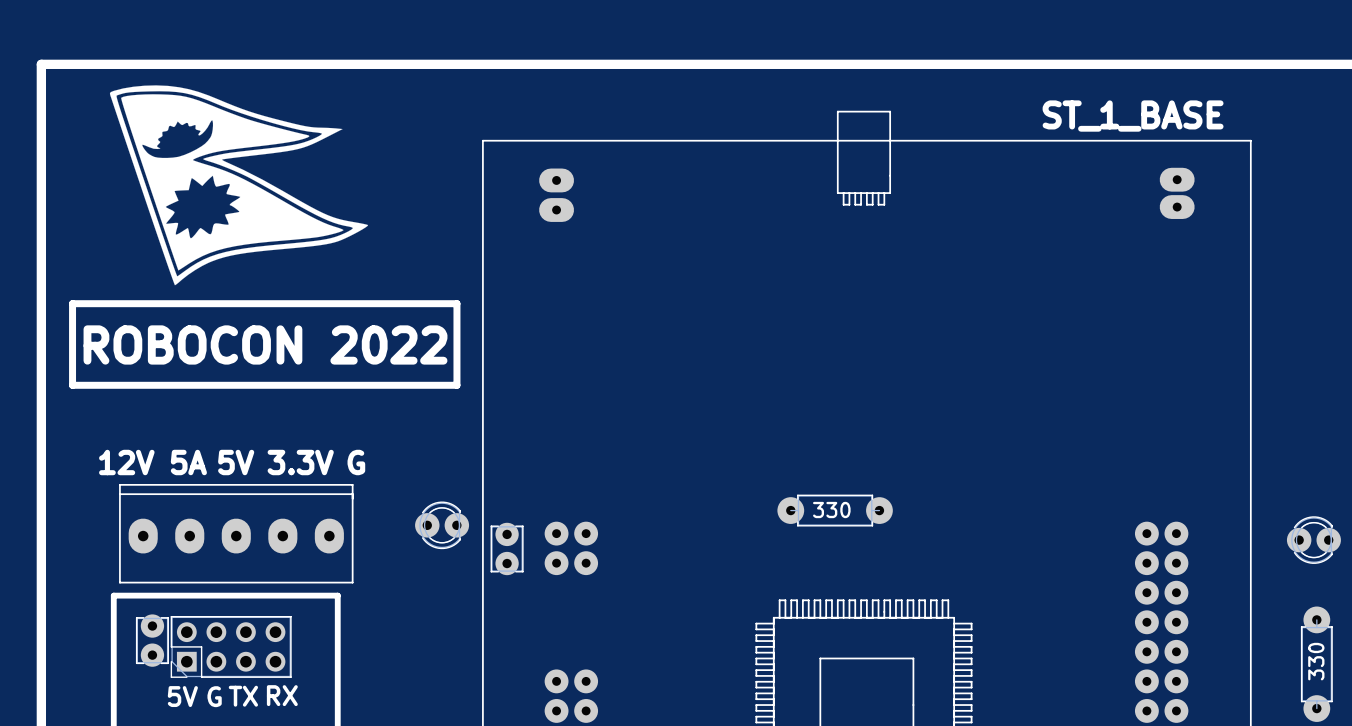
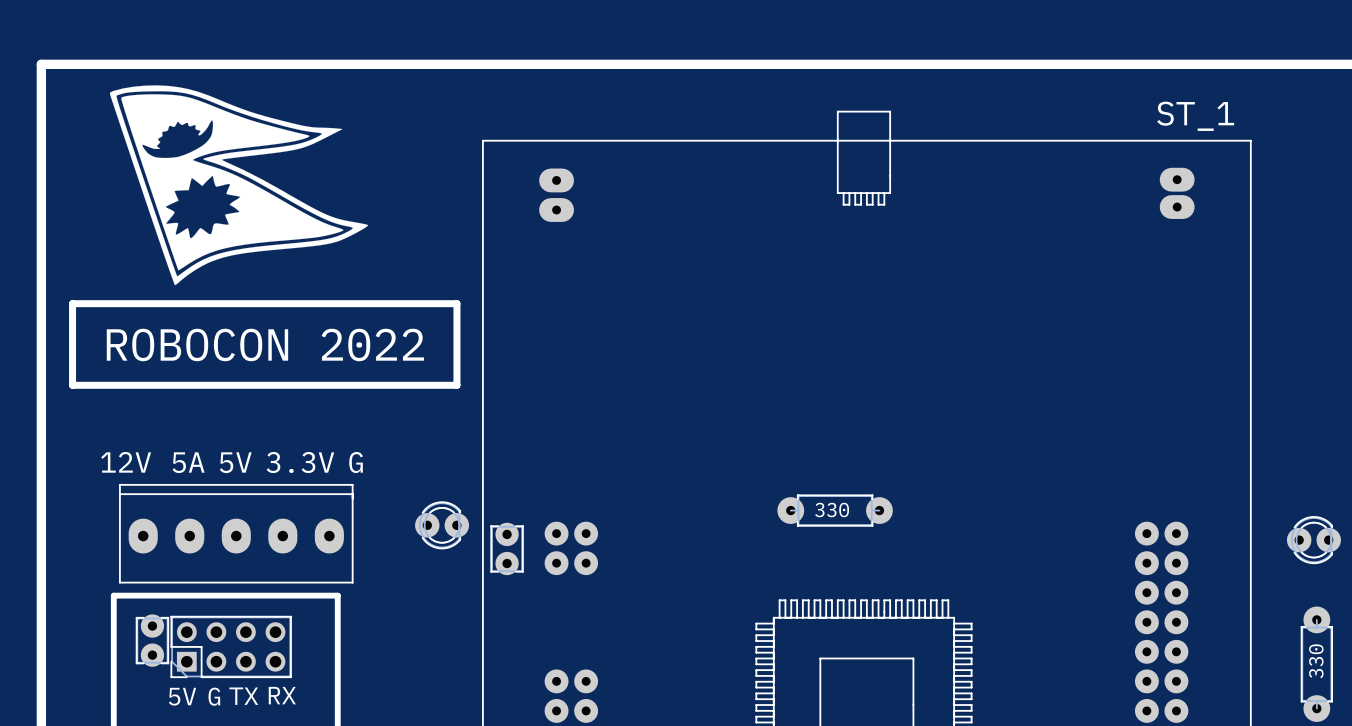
text: ST_1_BASE (1133, 116) -> ST_1 (1195, 116)

